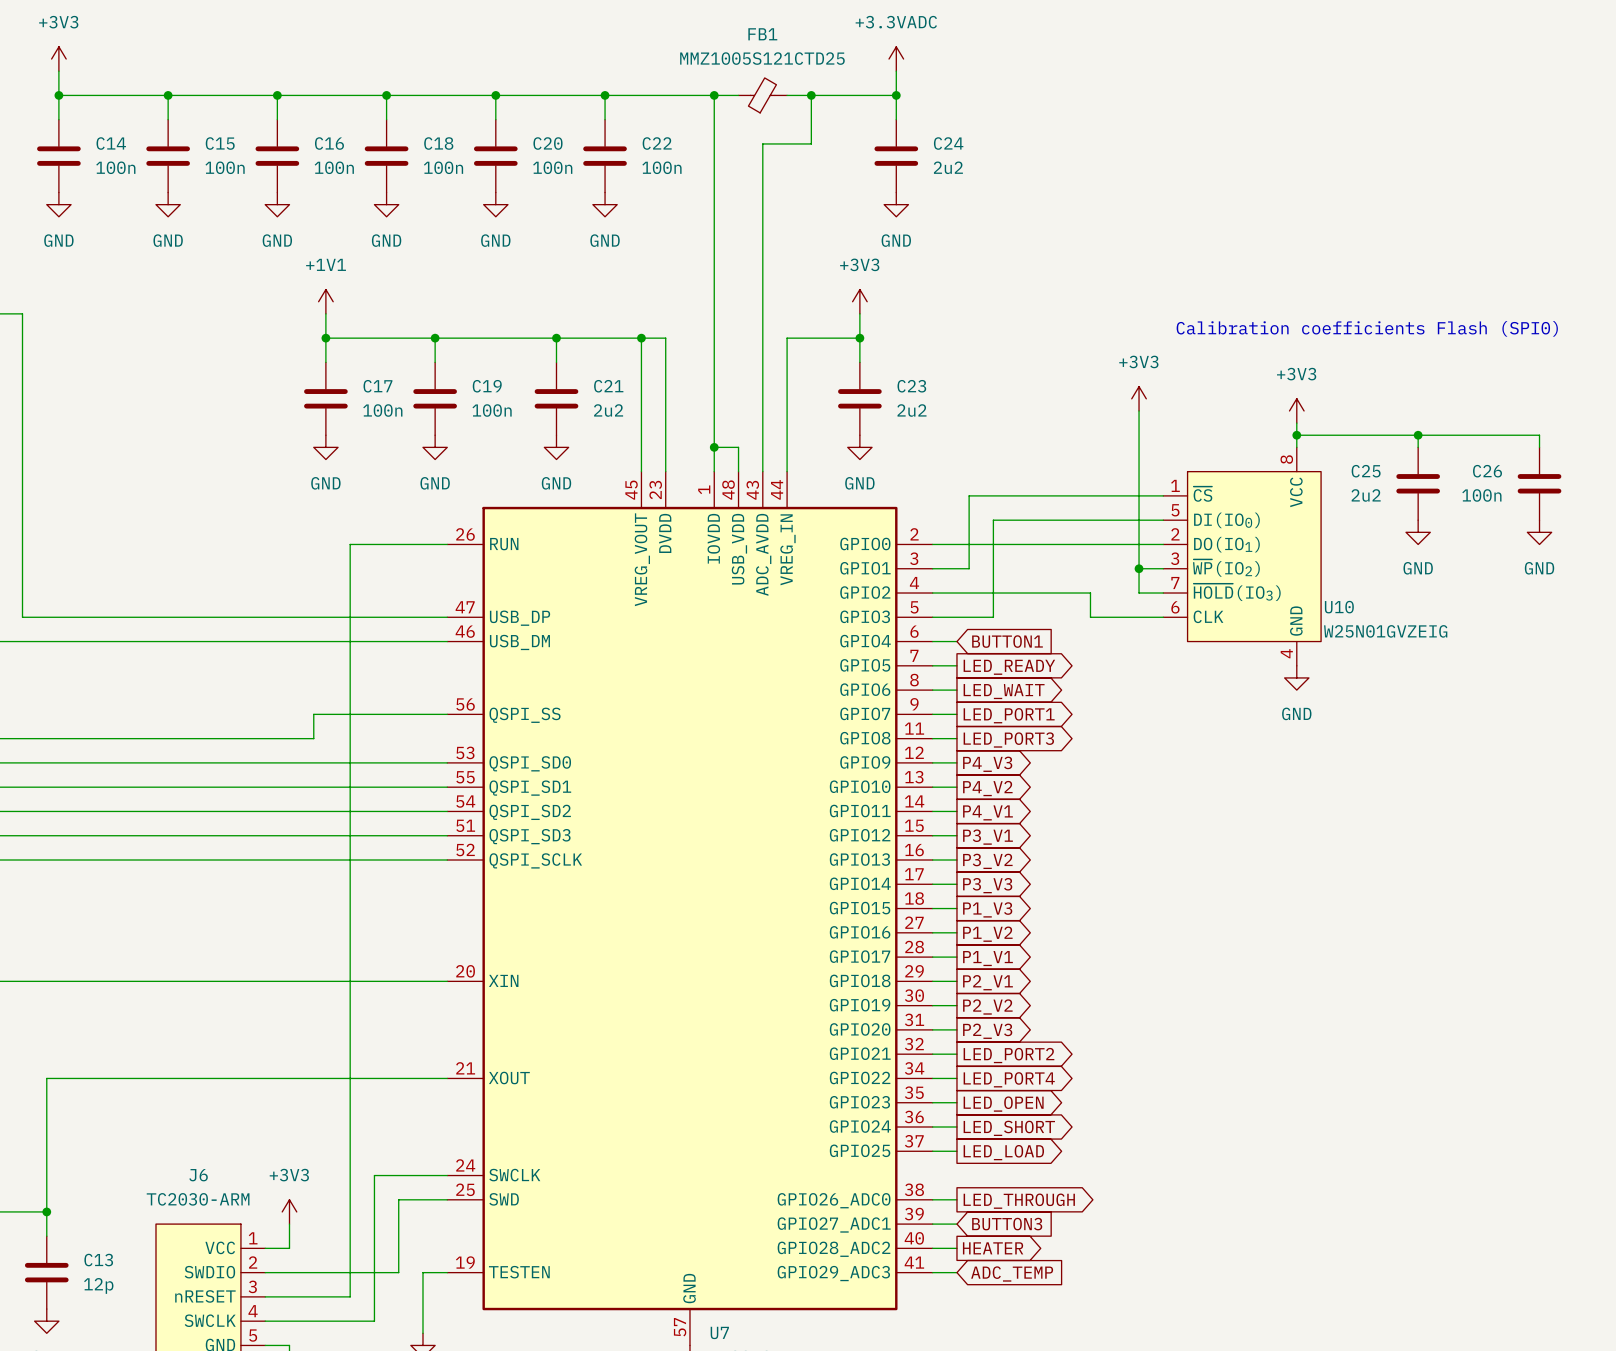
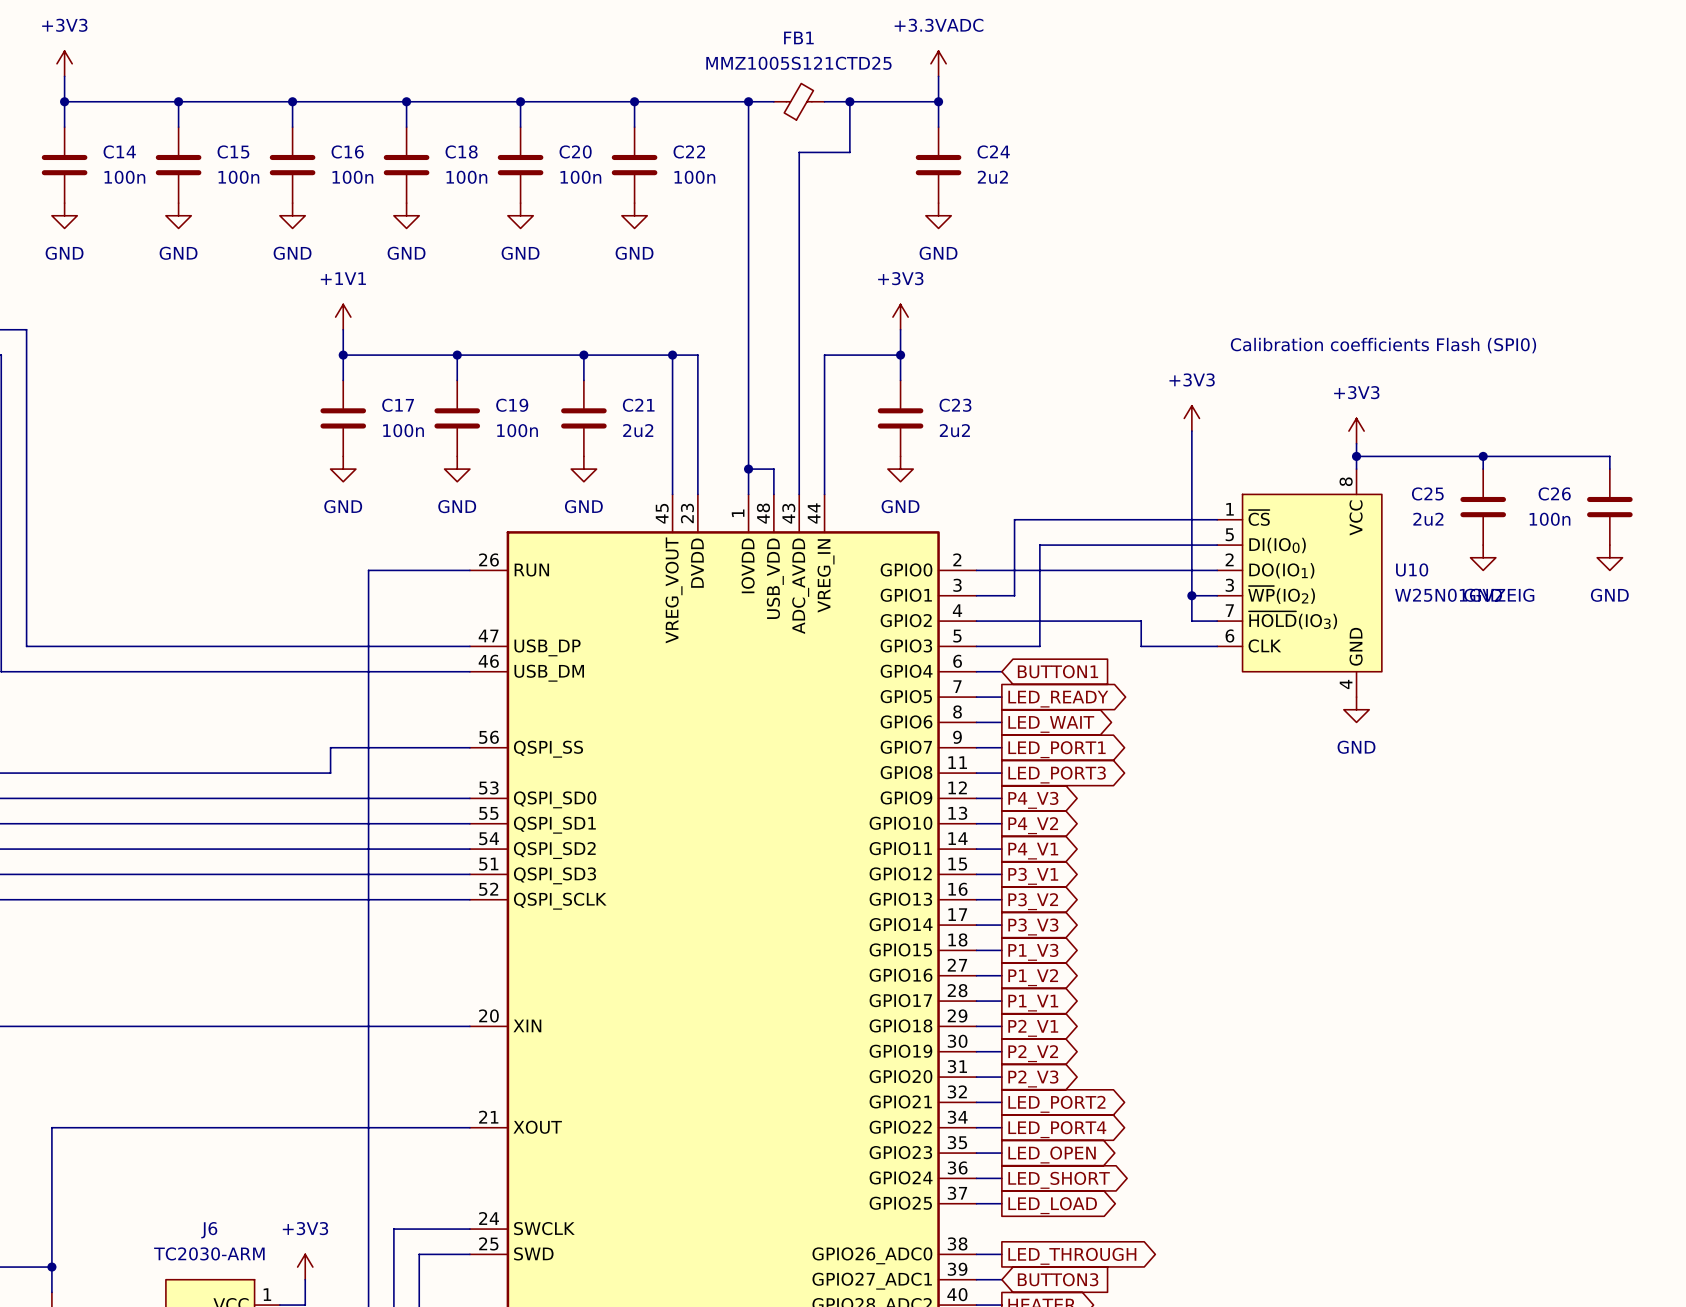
U10 name position: U10 (1339, 607) -> U10 (1412, 569)
U10 value position: W25N01GVZEIG (1385, 631) -> W25N01GVZEIG (1464, 595)

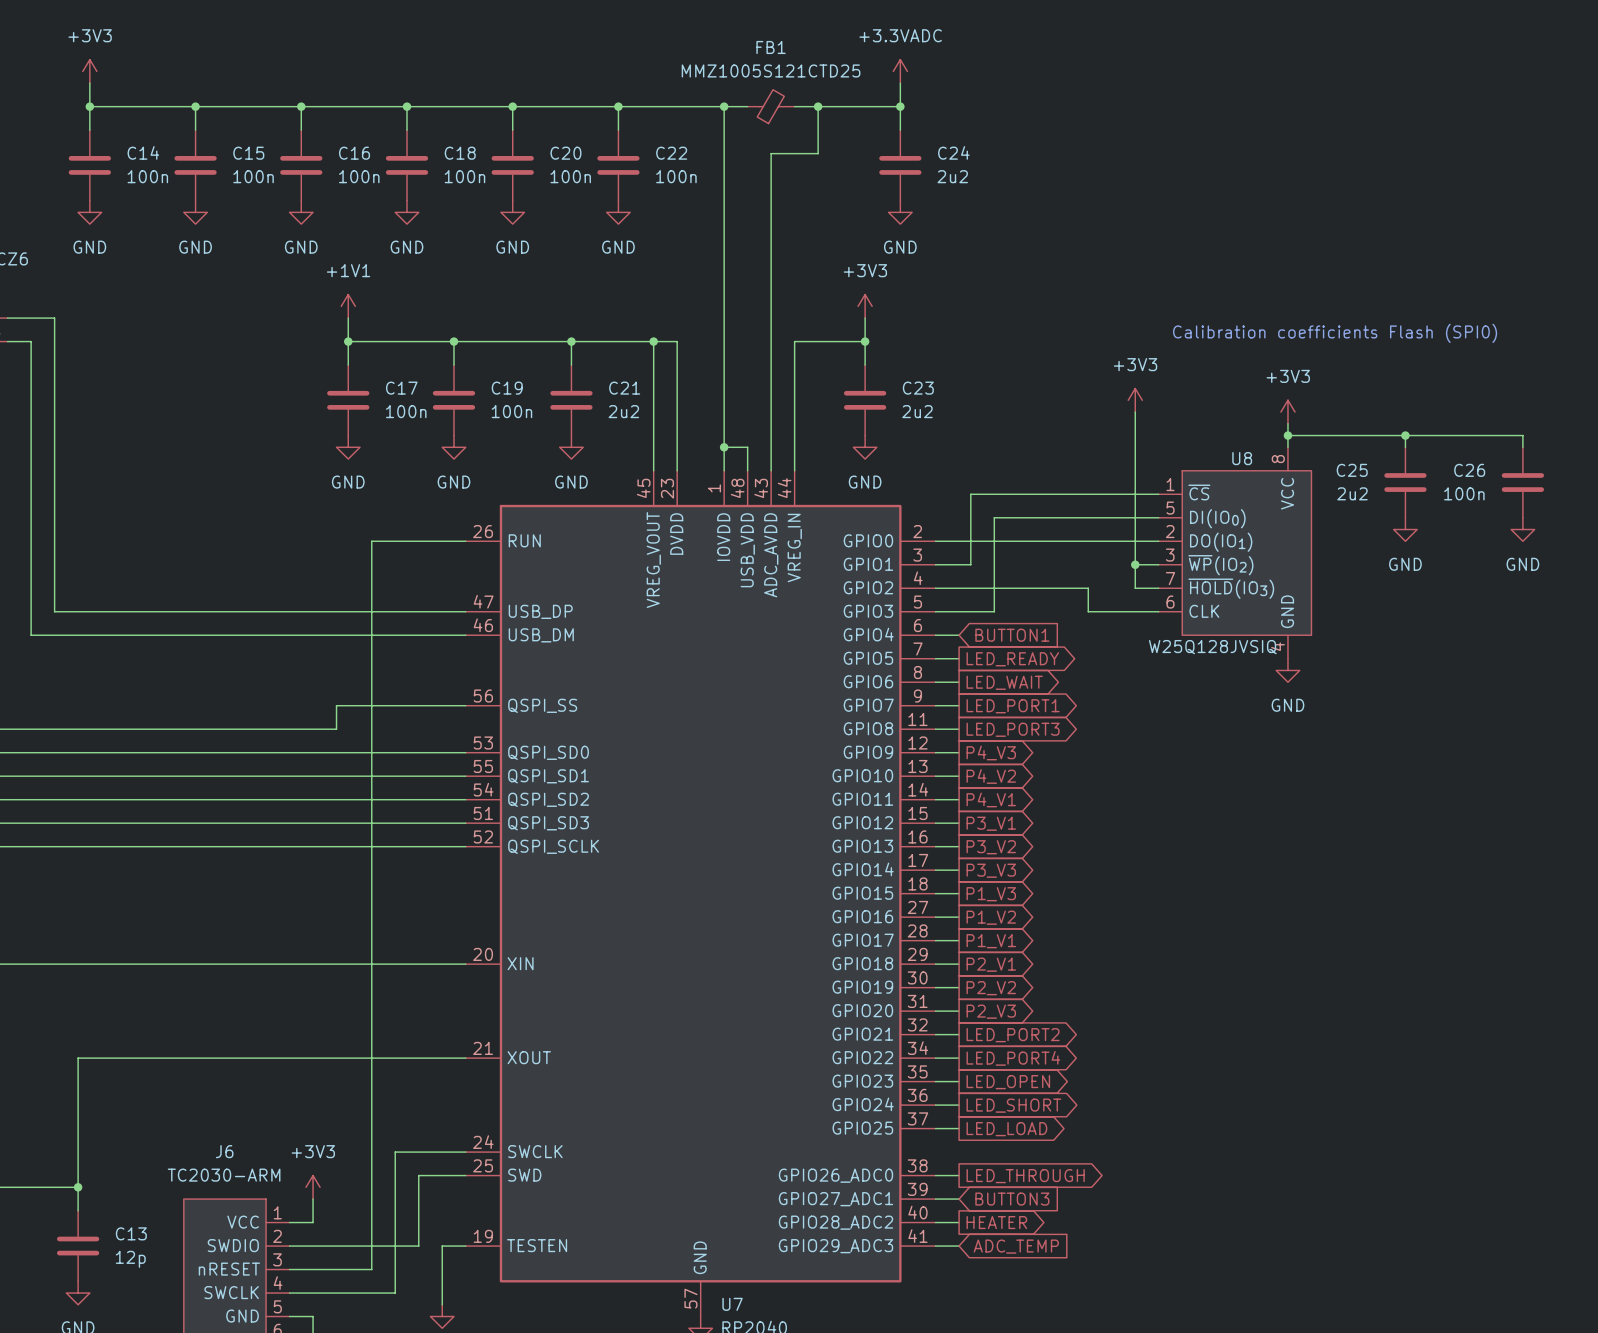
U10 name: U10 (1412, 569) -> U8 (1242, 458)
U10 value: W25N01GVZEIG (1464, 595) -> W25Q128JVSIQ (1212, 647)

